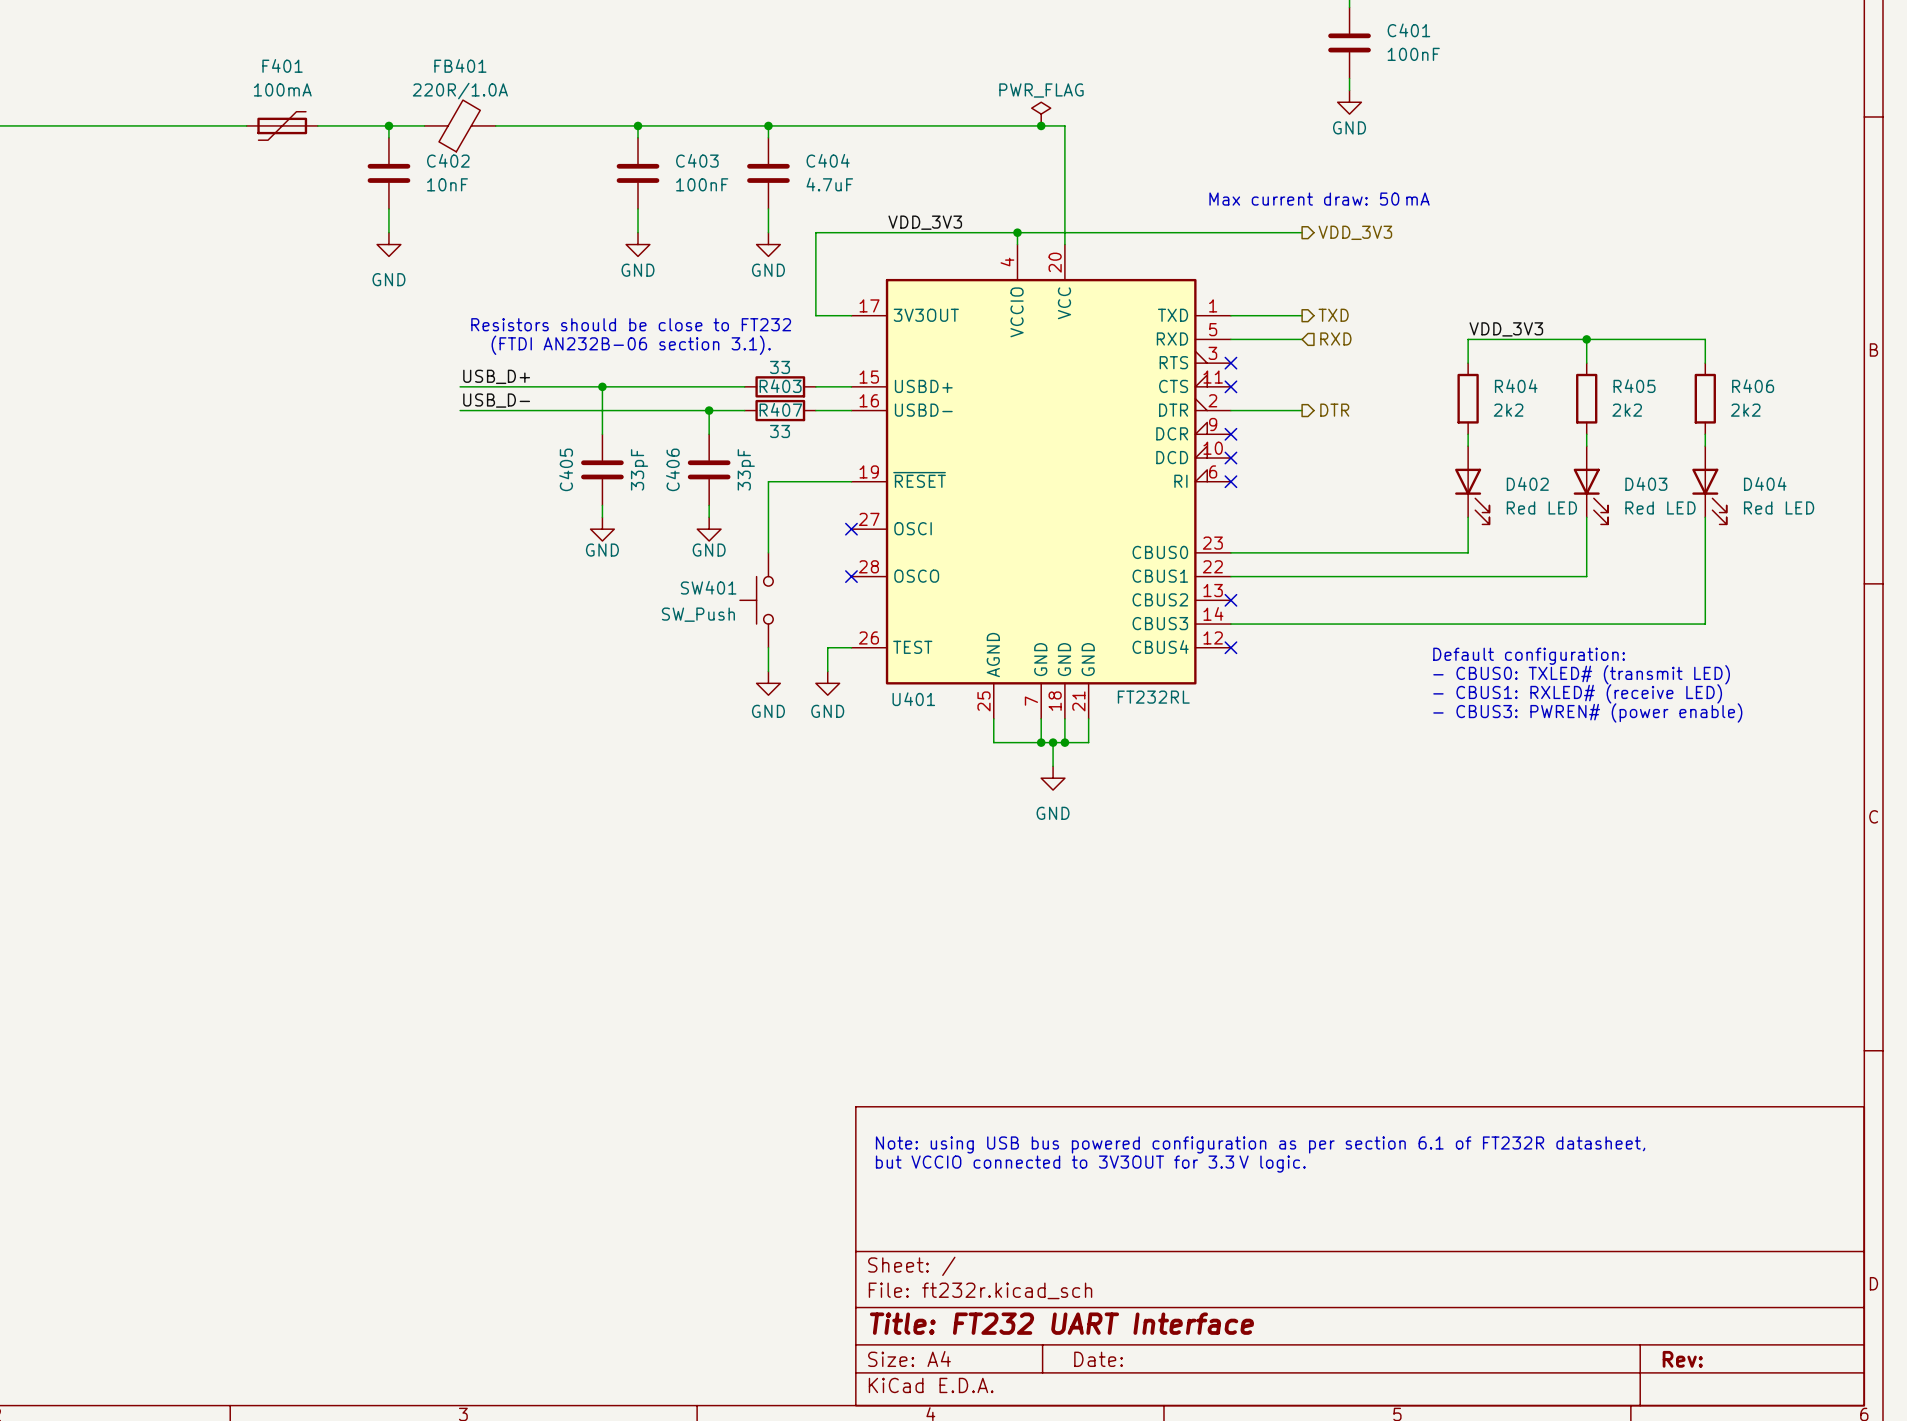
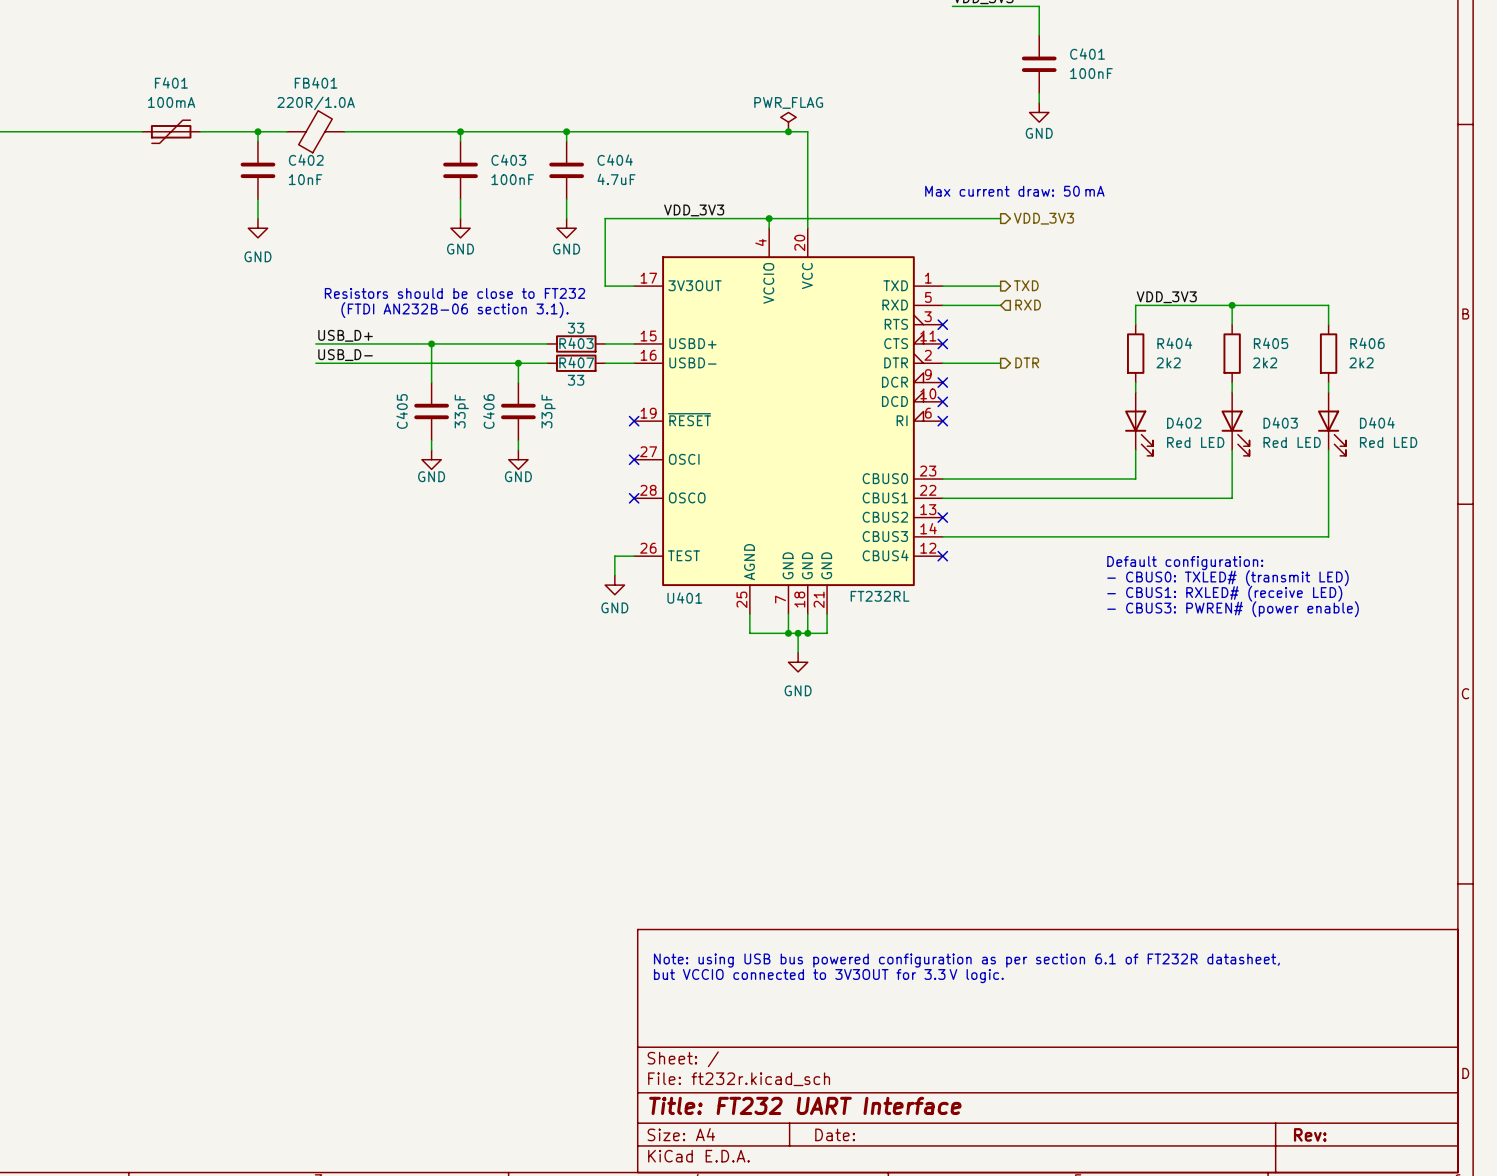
wire: (851, 481) (768, 481) (768, 552) -> none
no-connect mark: none -> (634, 421)
SW401: SW_Push (756, 600) -> none
wire: (768, 647) (768, 671) -> none
power symbol: GND (768, 683) -> none

